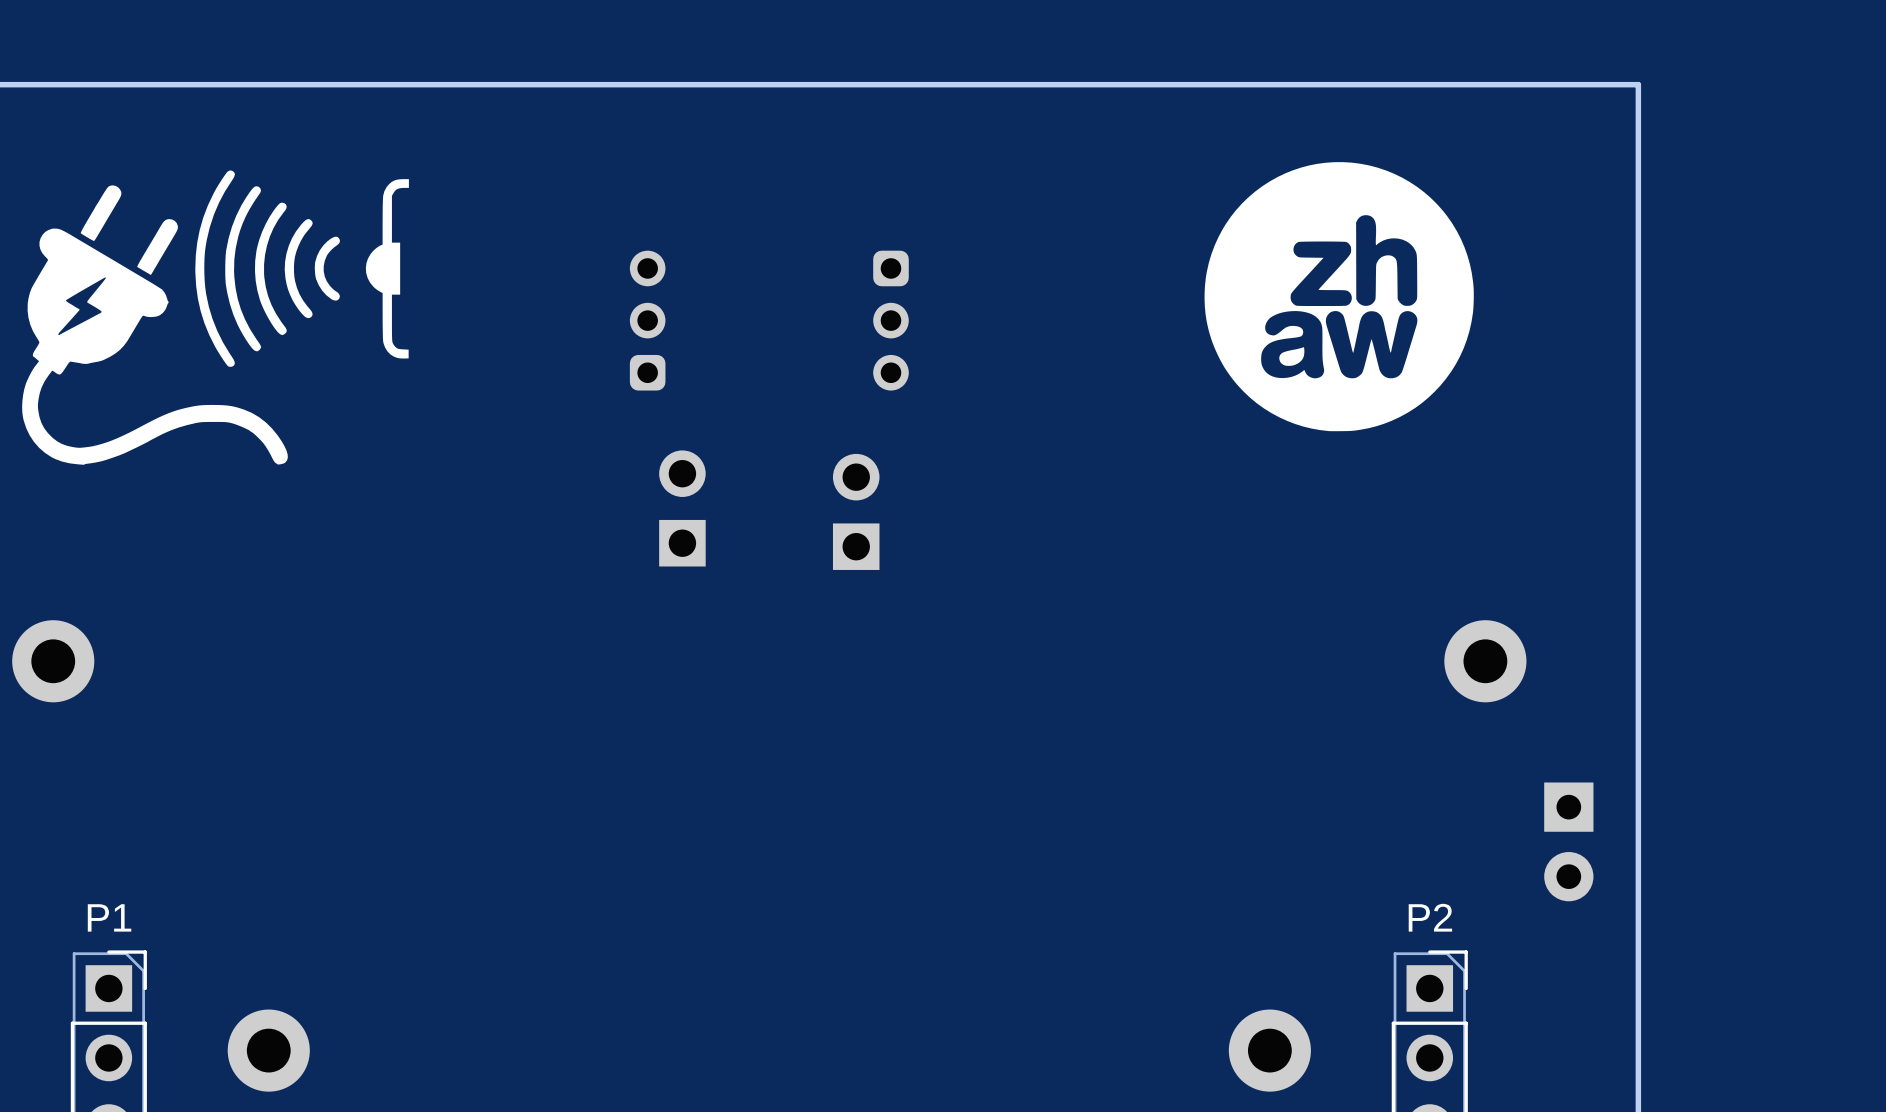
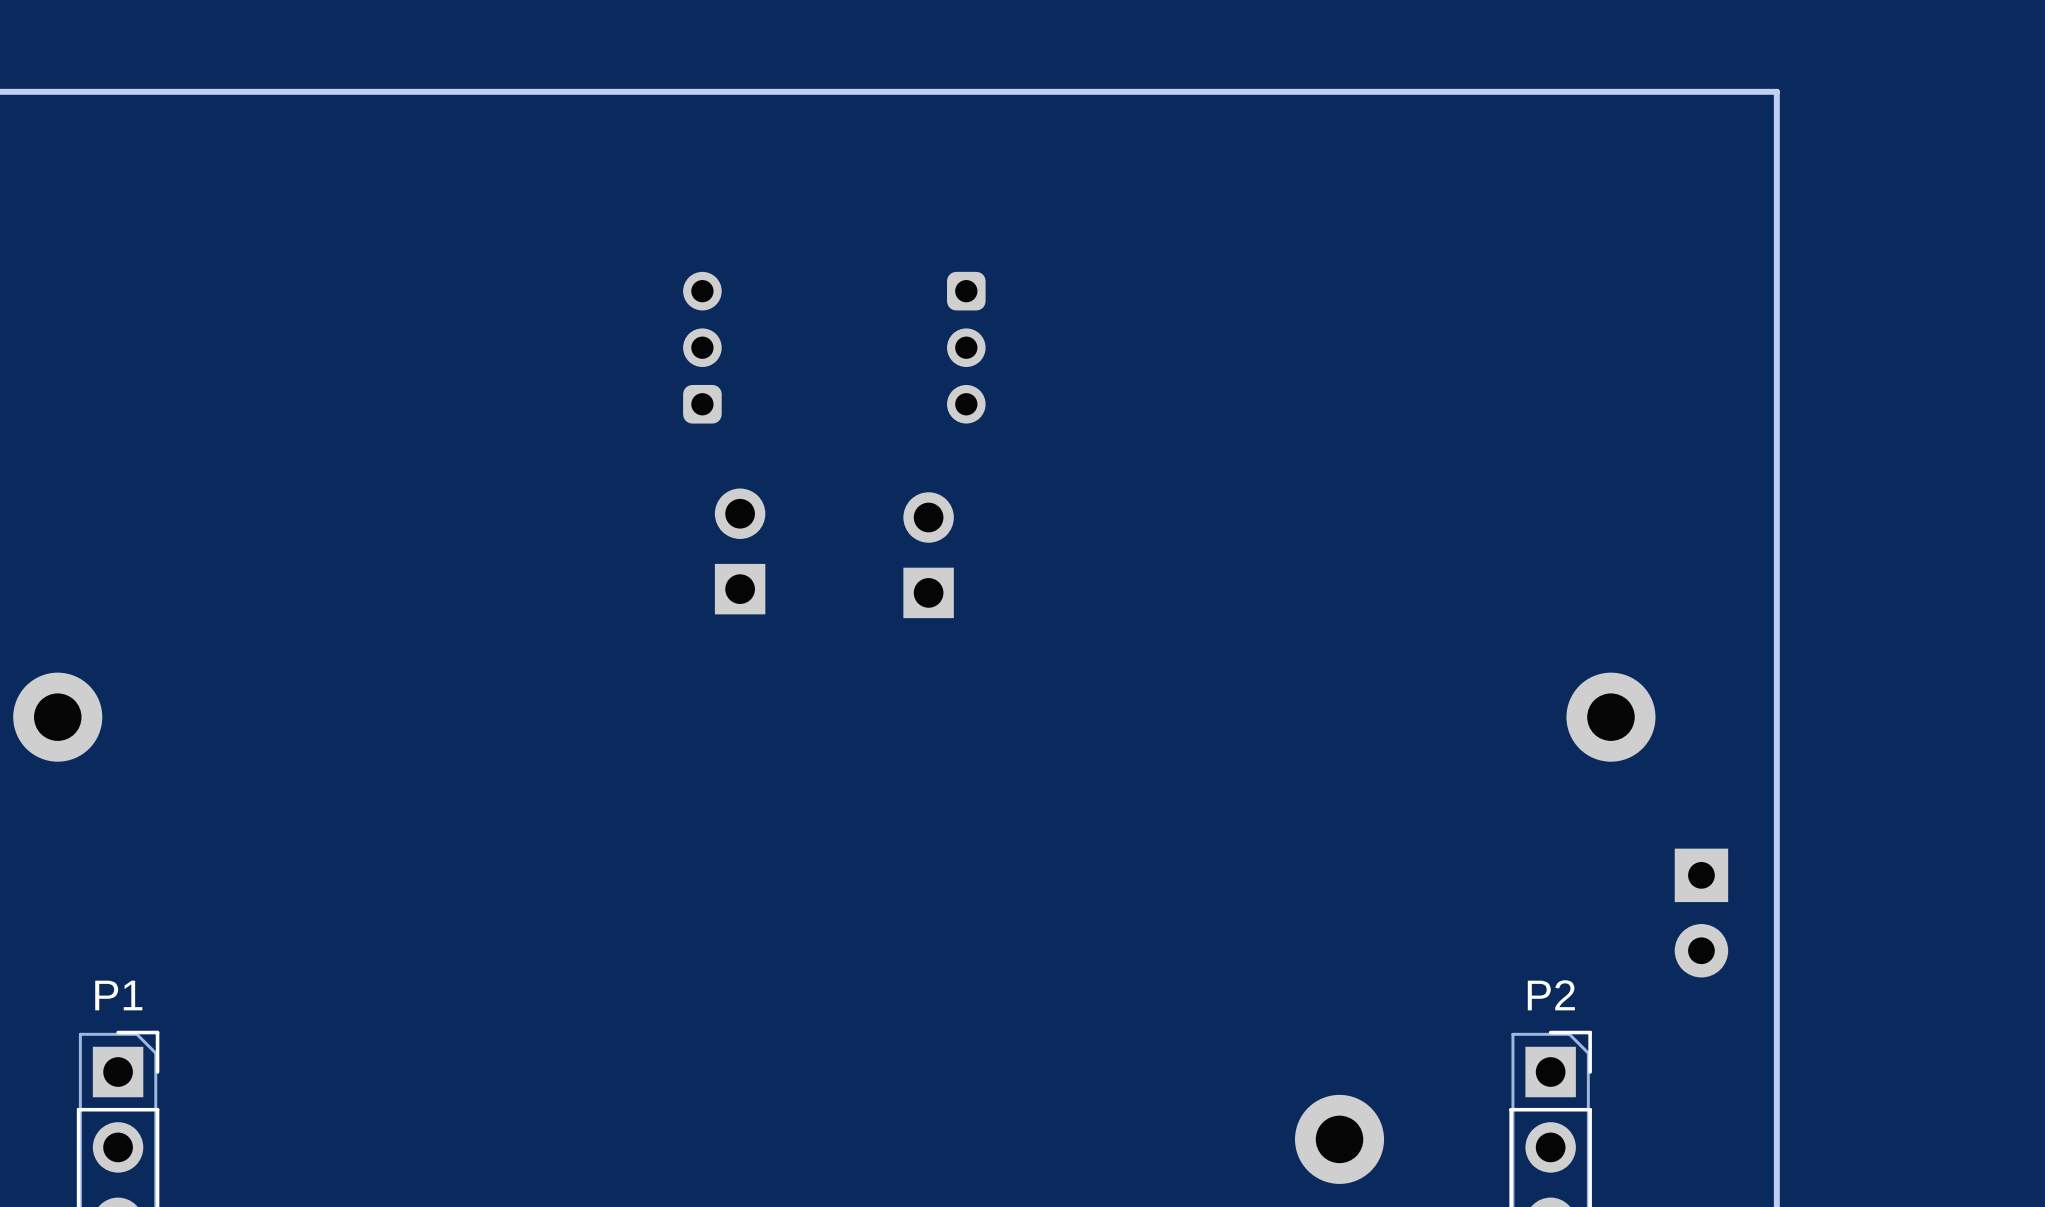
drawing: [1204, 162, 1474, 432] -> none
drawing: [22, 170, 409, 465] -> none
part: (268, 1050) -> none
part position: (1269, 1050) -> (1339, 1139)

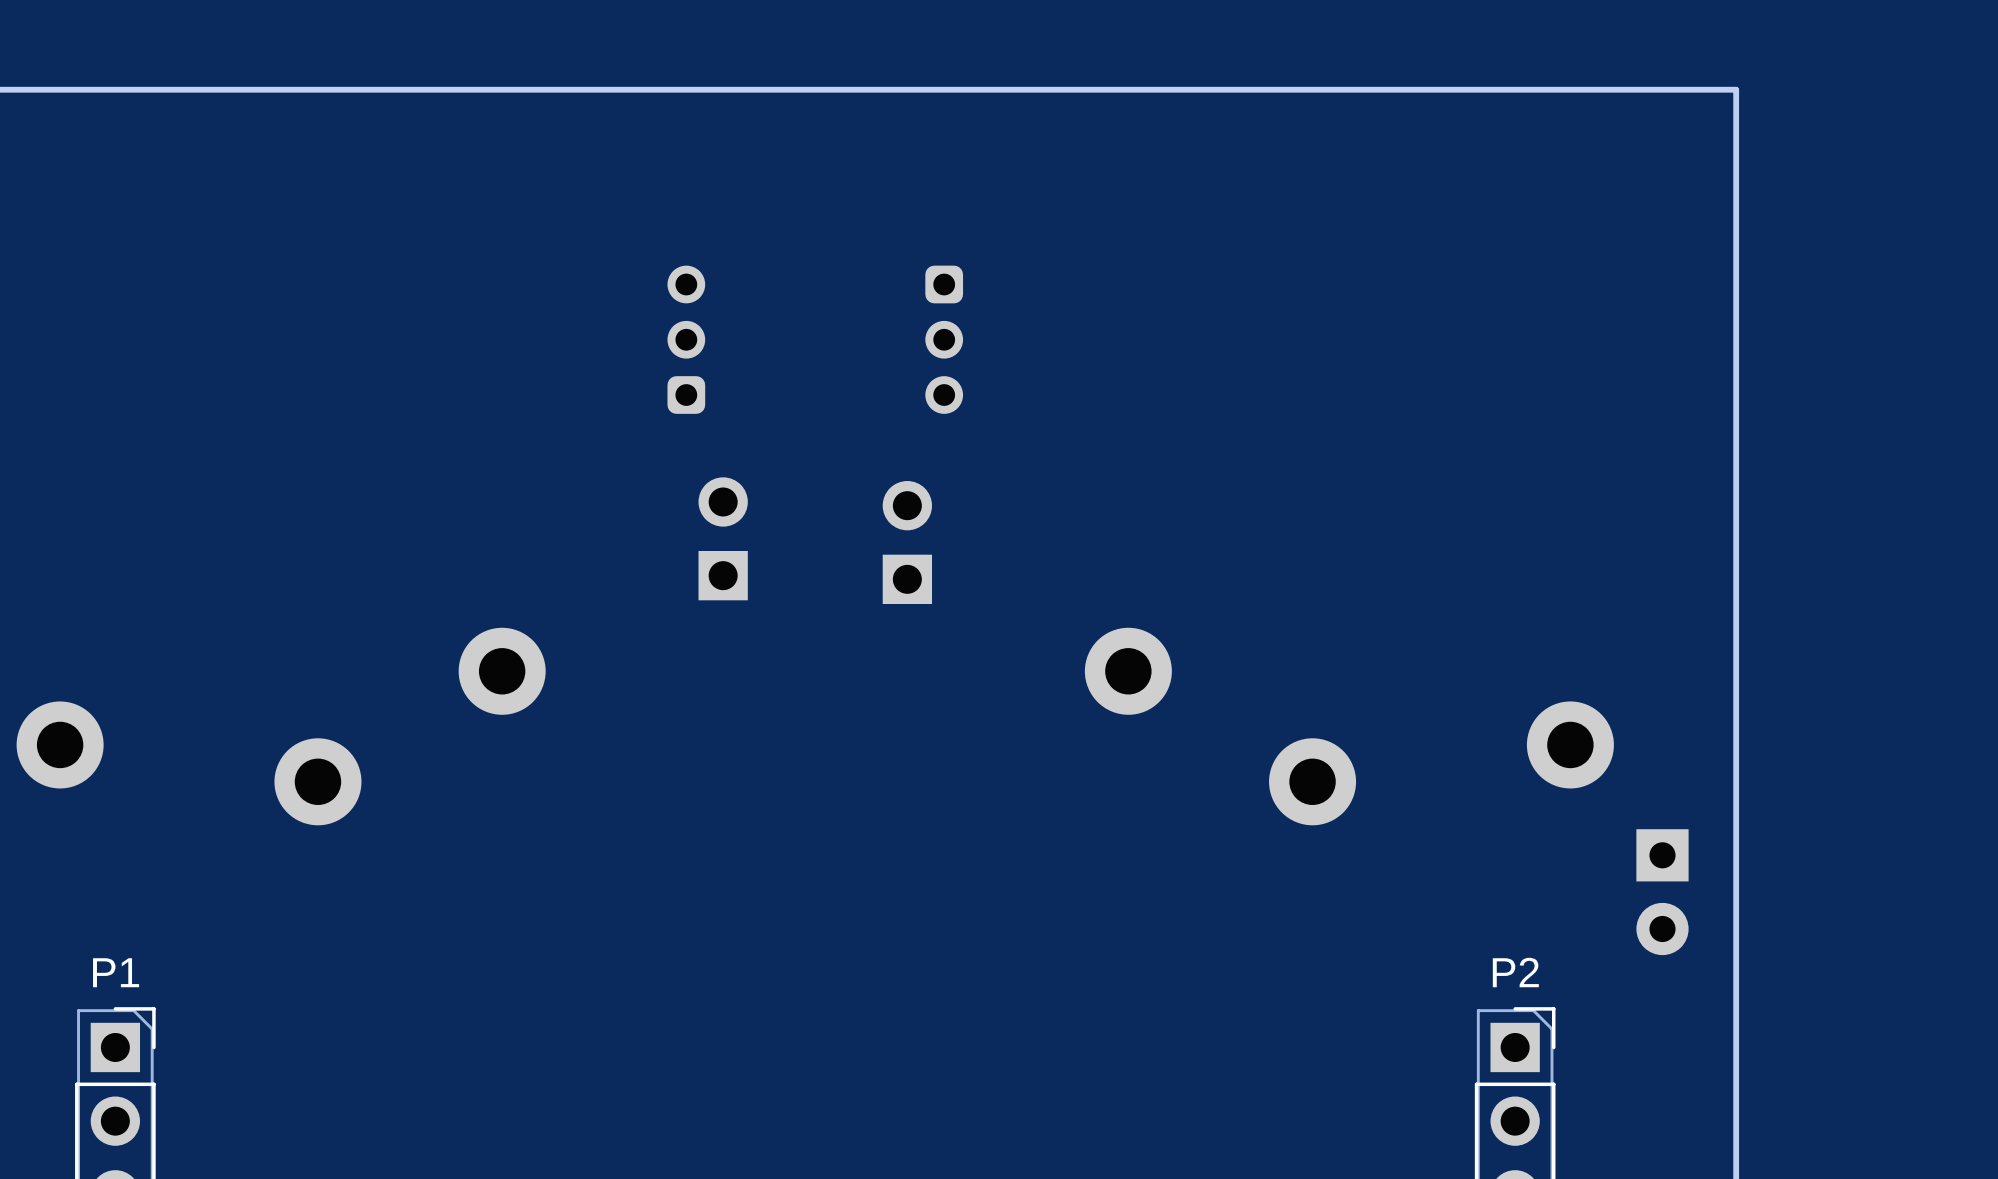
part: none -> (502, 671)
part: none -> (1128, 671)
part position: (57, 717) -> (60, 744)
part position: (1610, 717) -> (1570, 744)
part: none -> (317, 781)
part: none -> (1312, 781)
part: (1339, 1139) -> none

